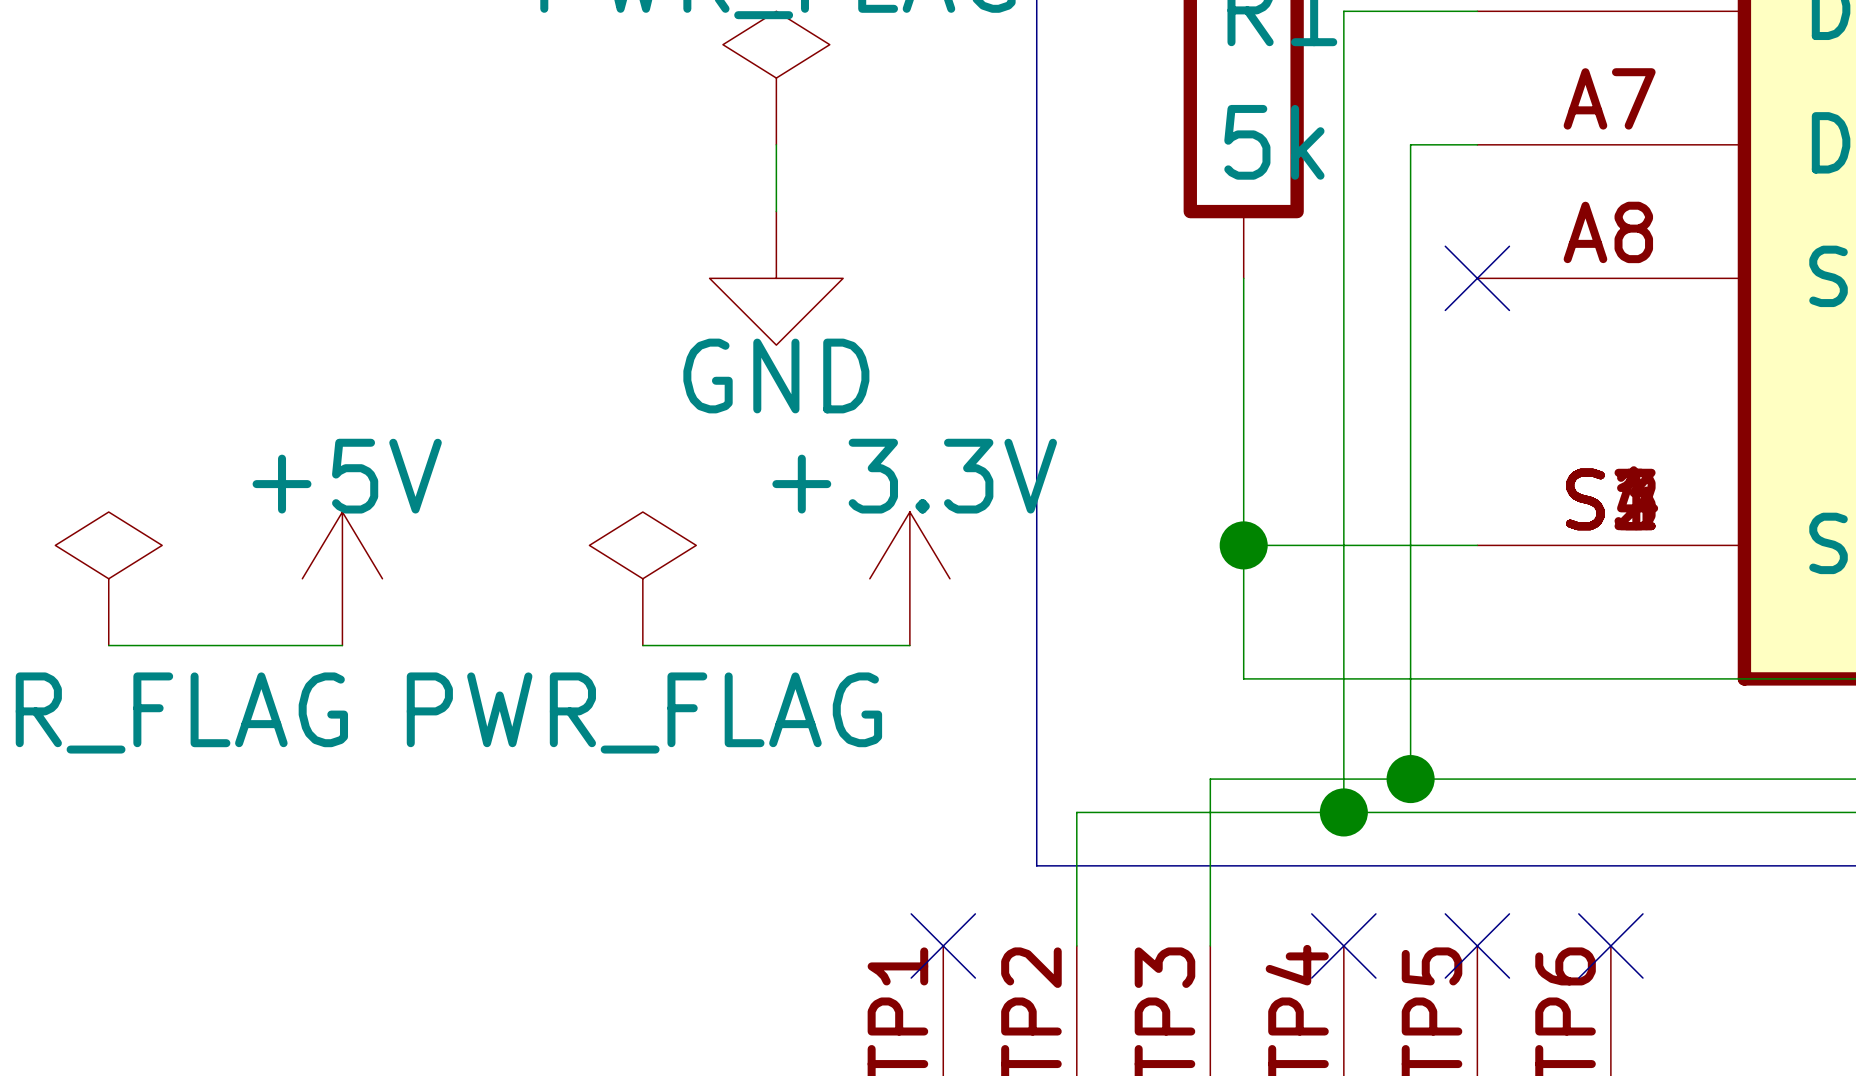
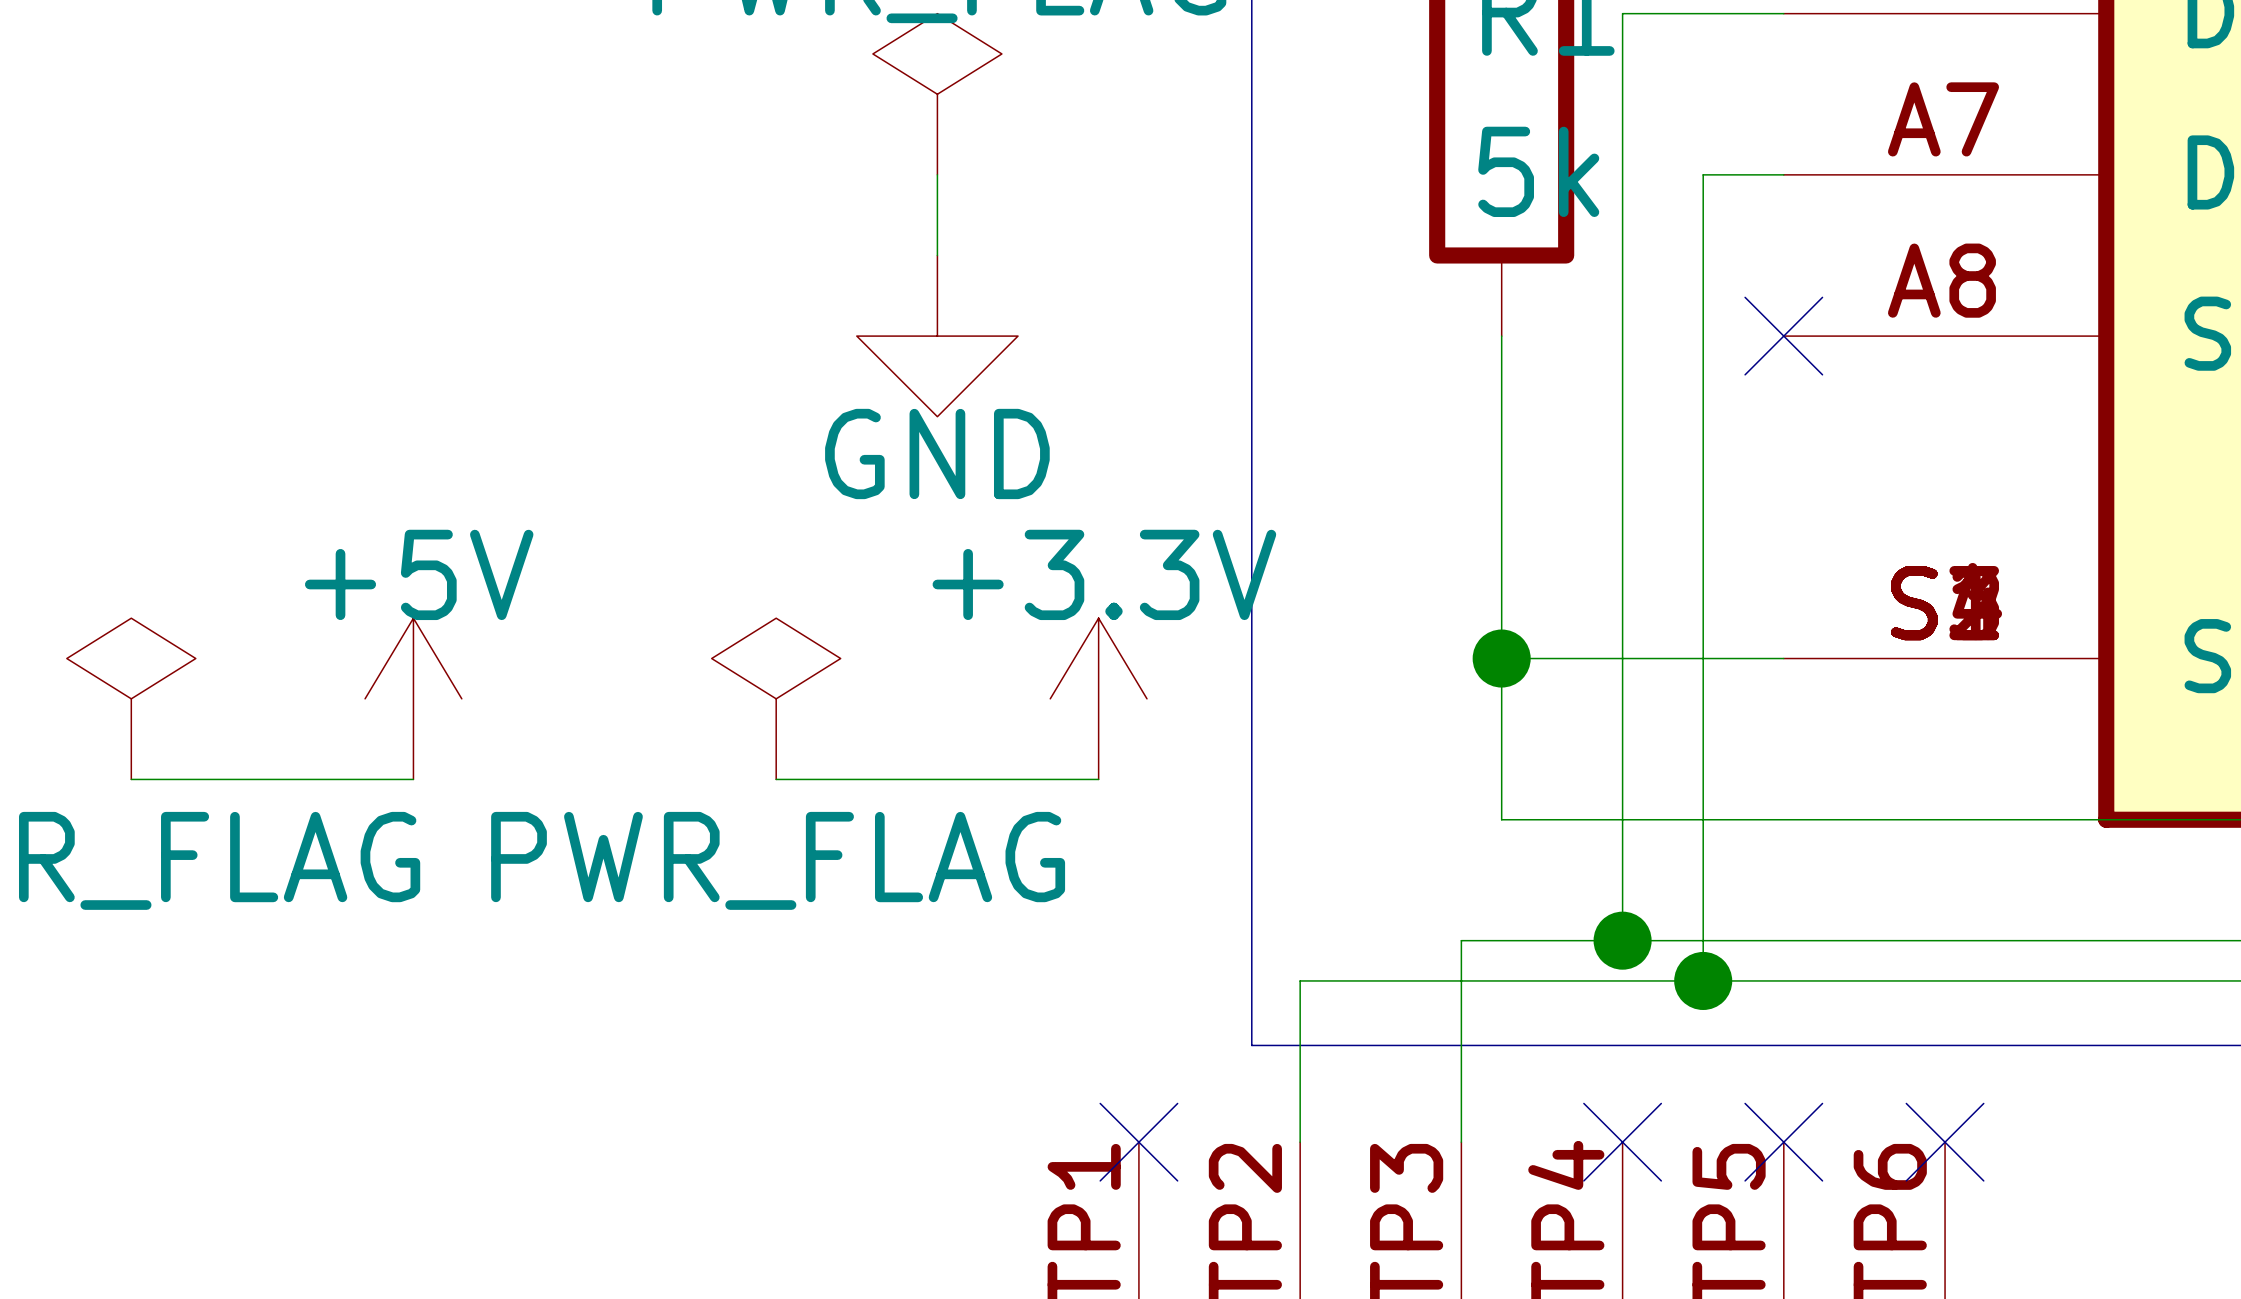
junction position: (1410, 779) -> (1703, 980)
junction position: (1343, 812) -> (1622, 940)

